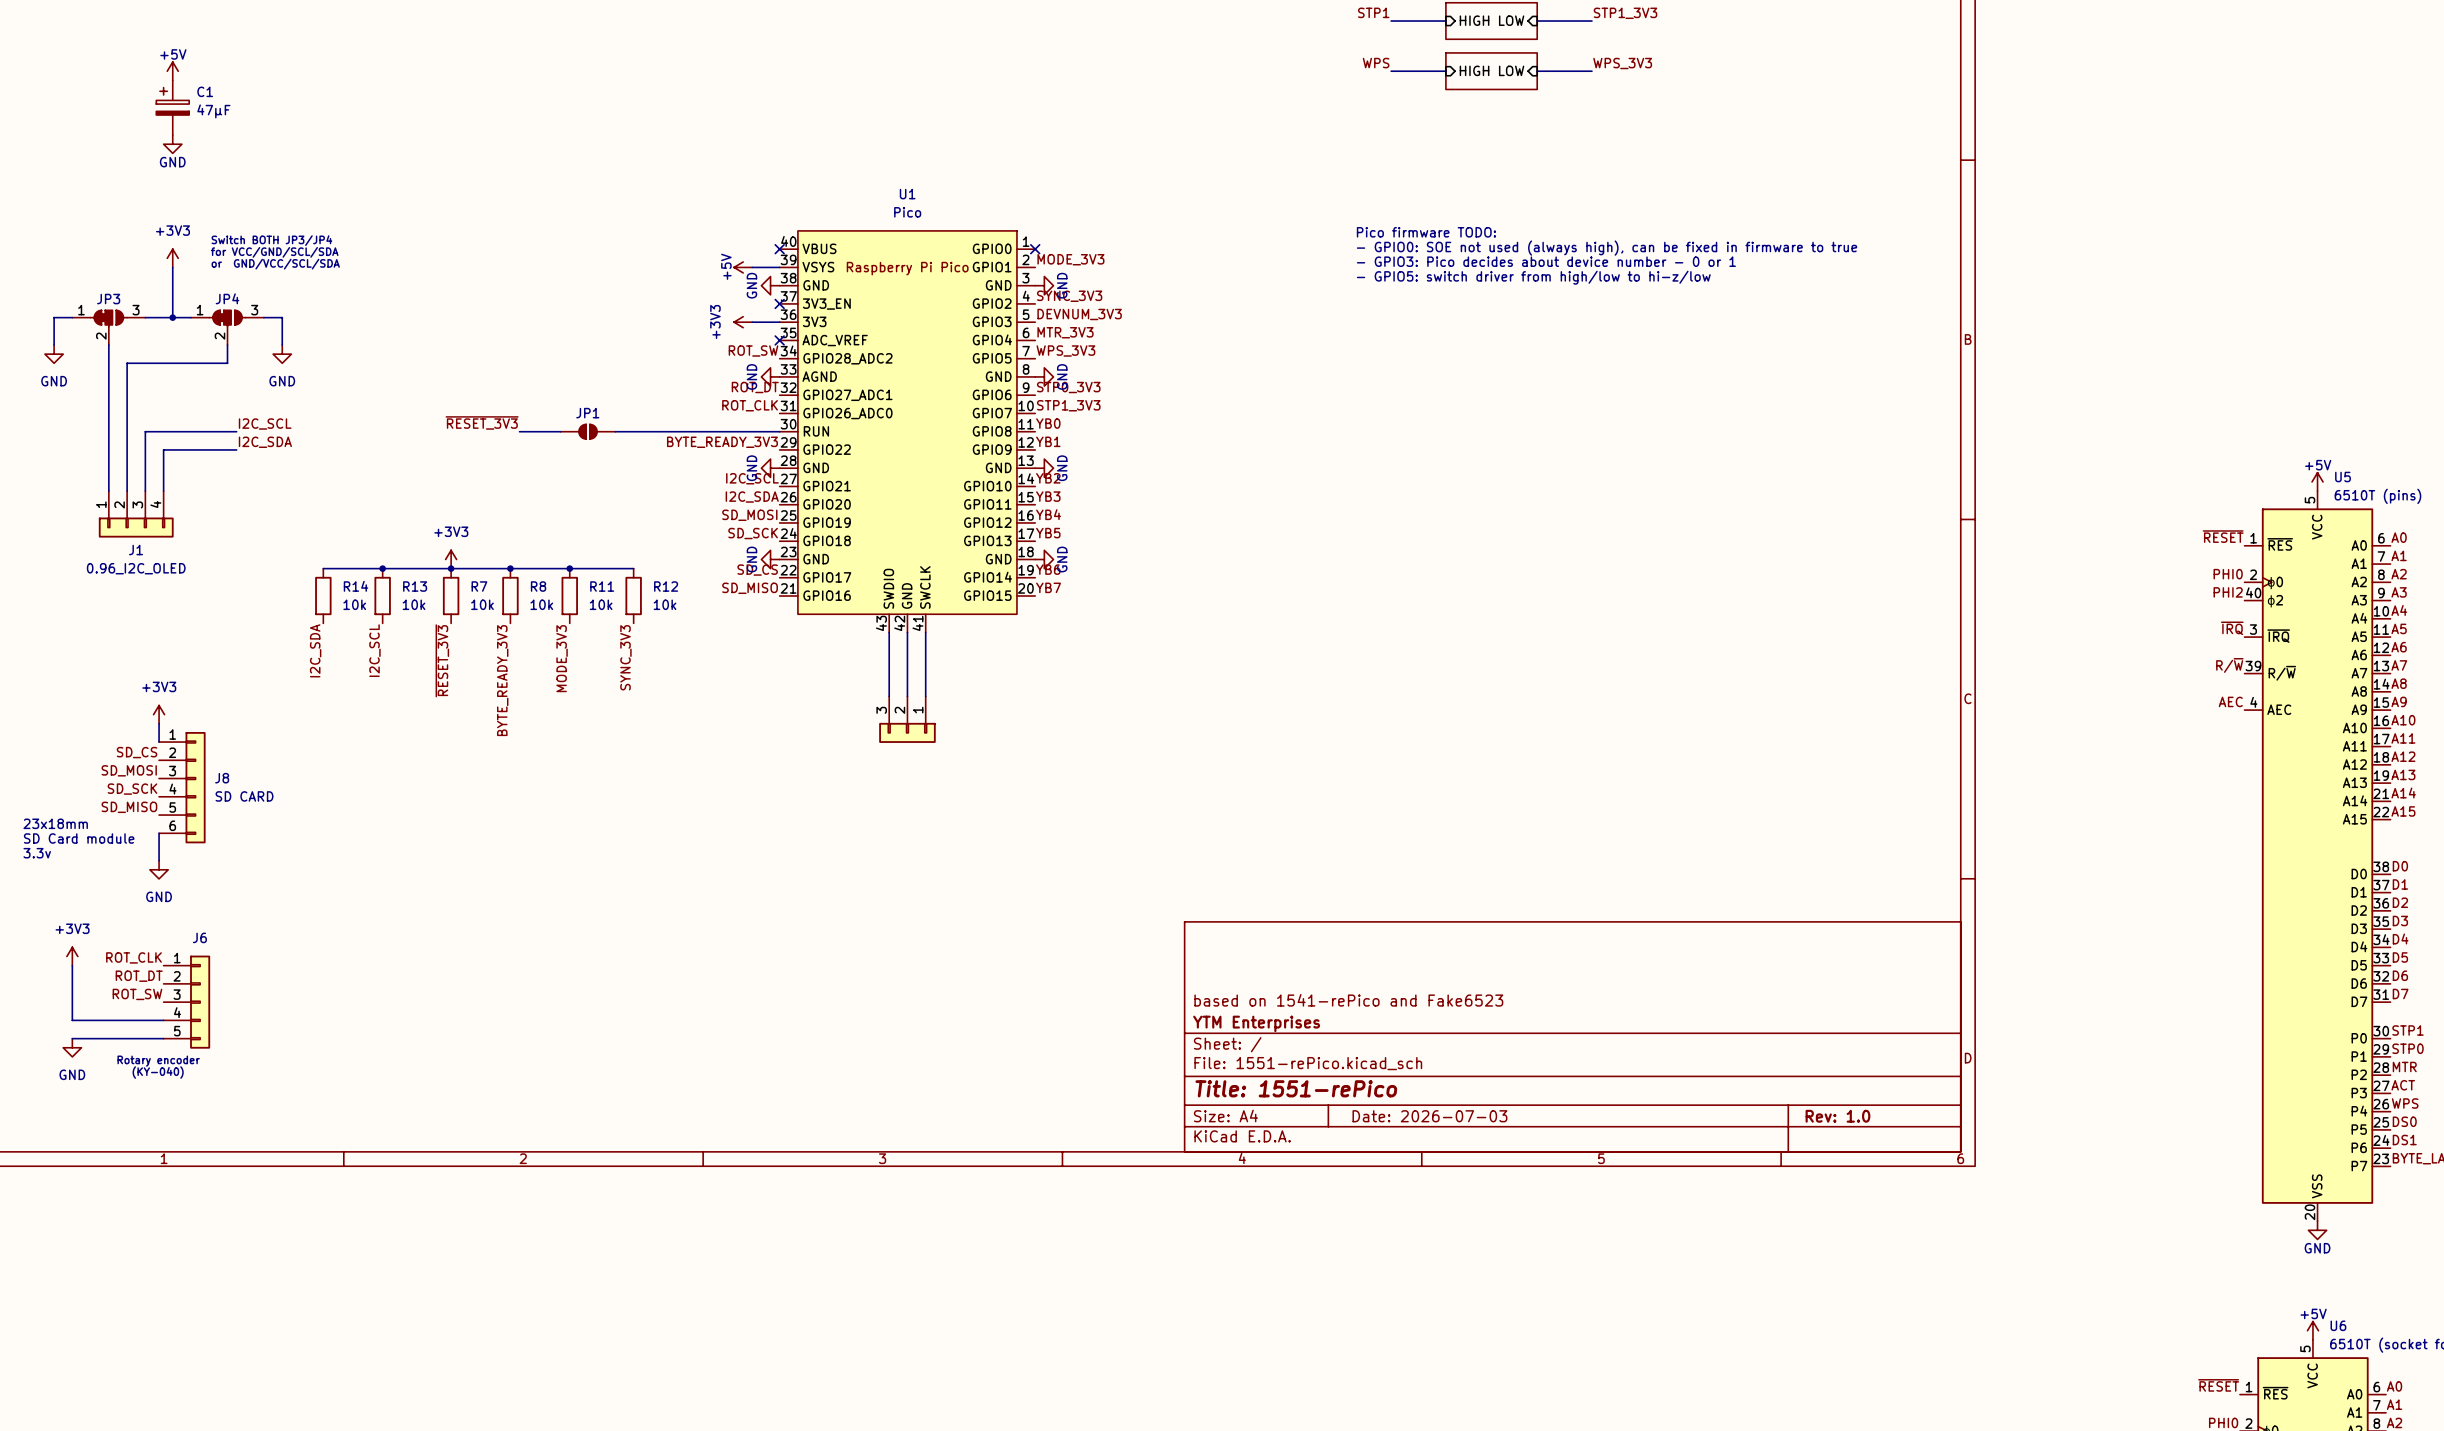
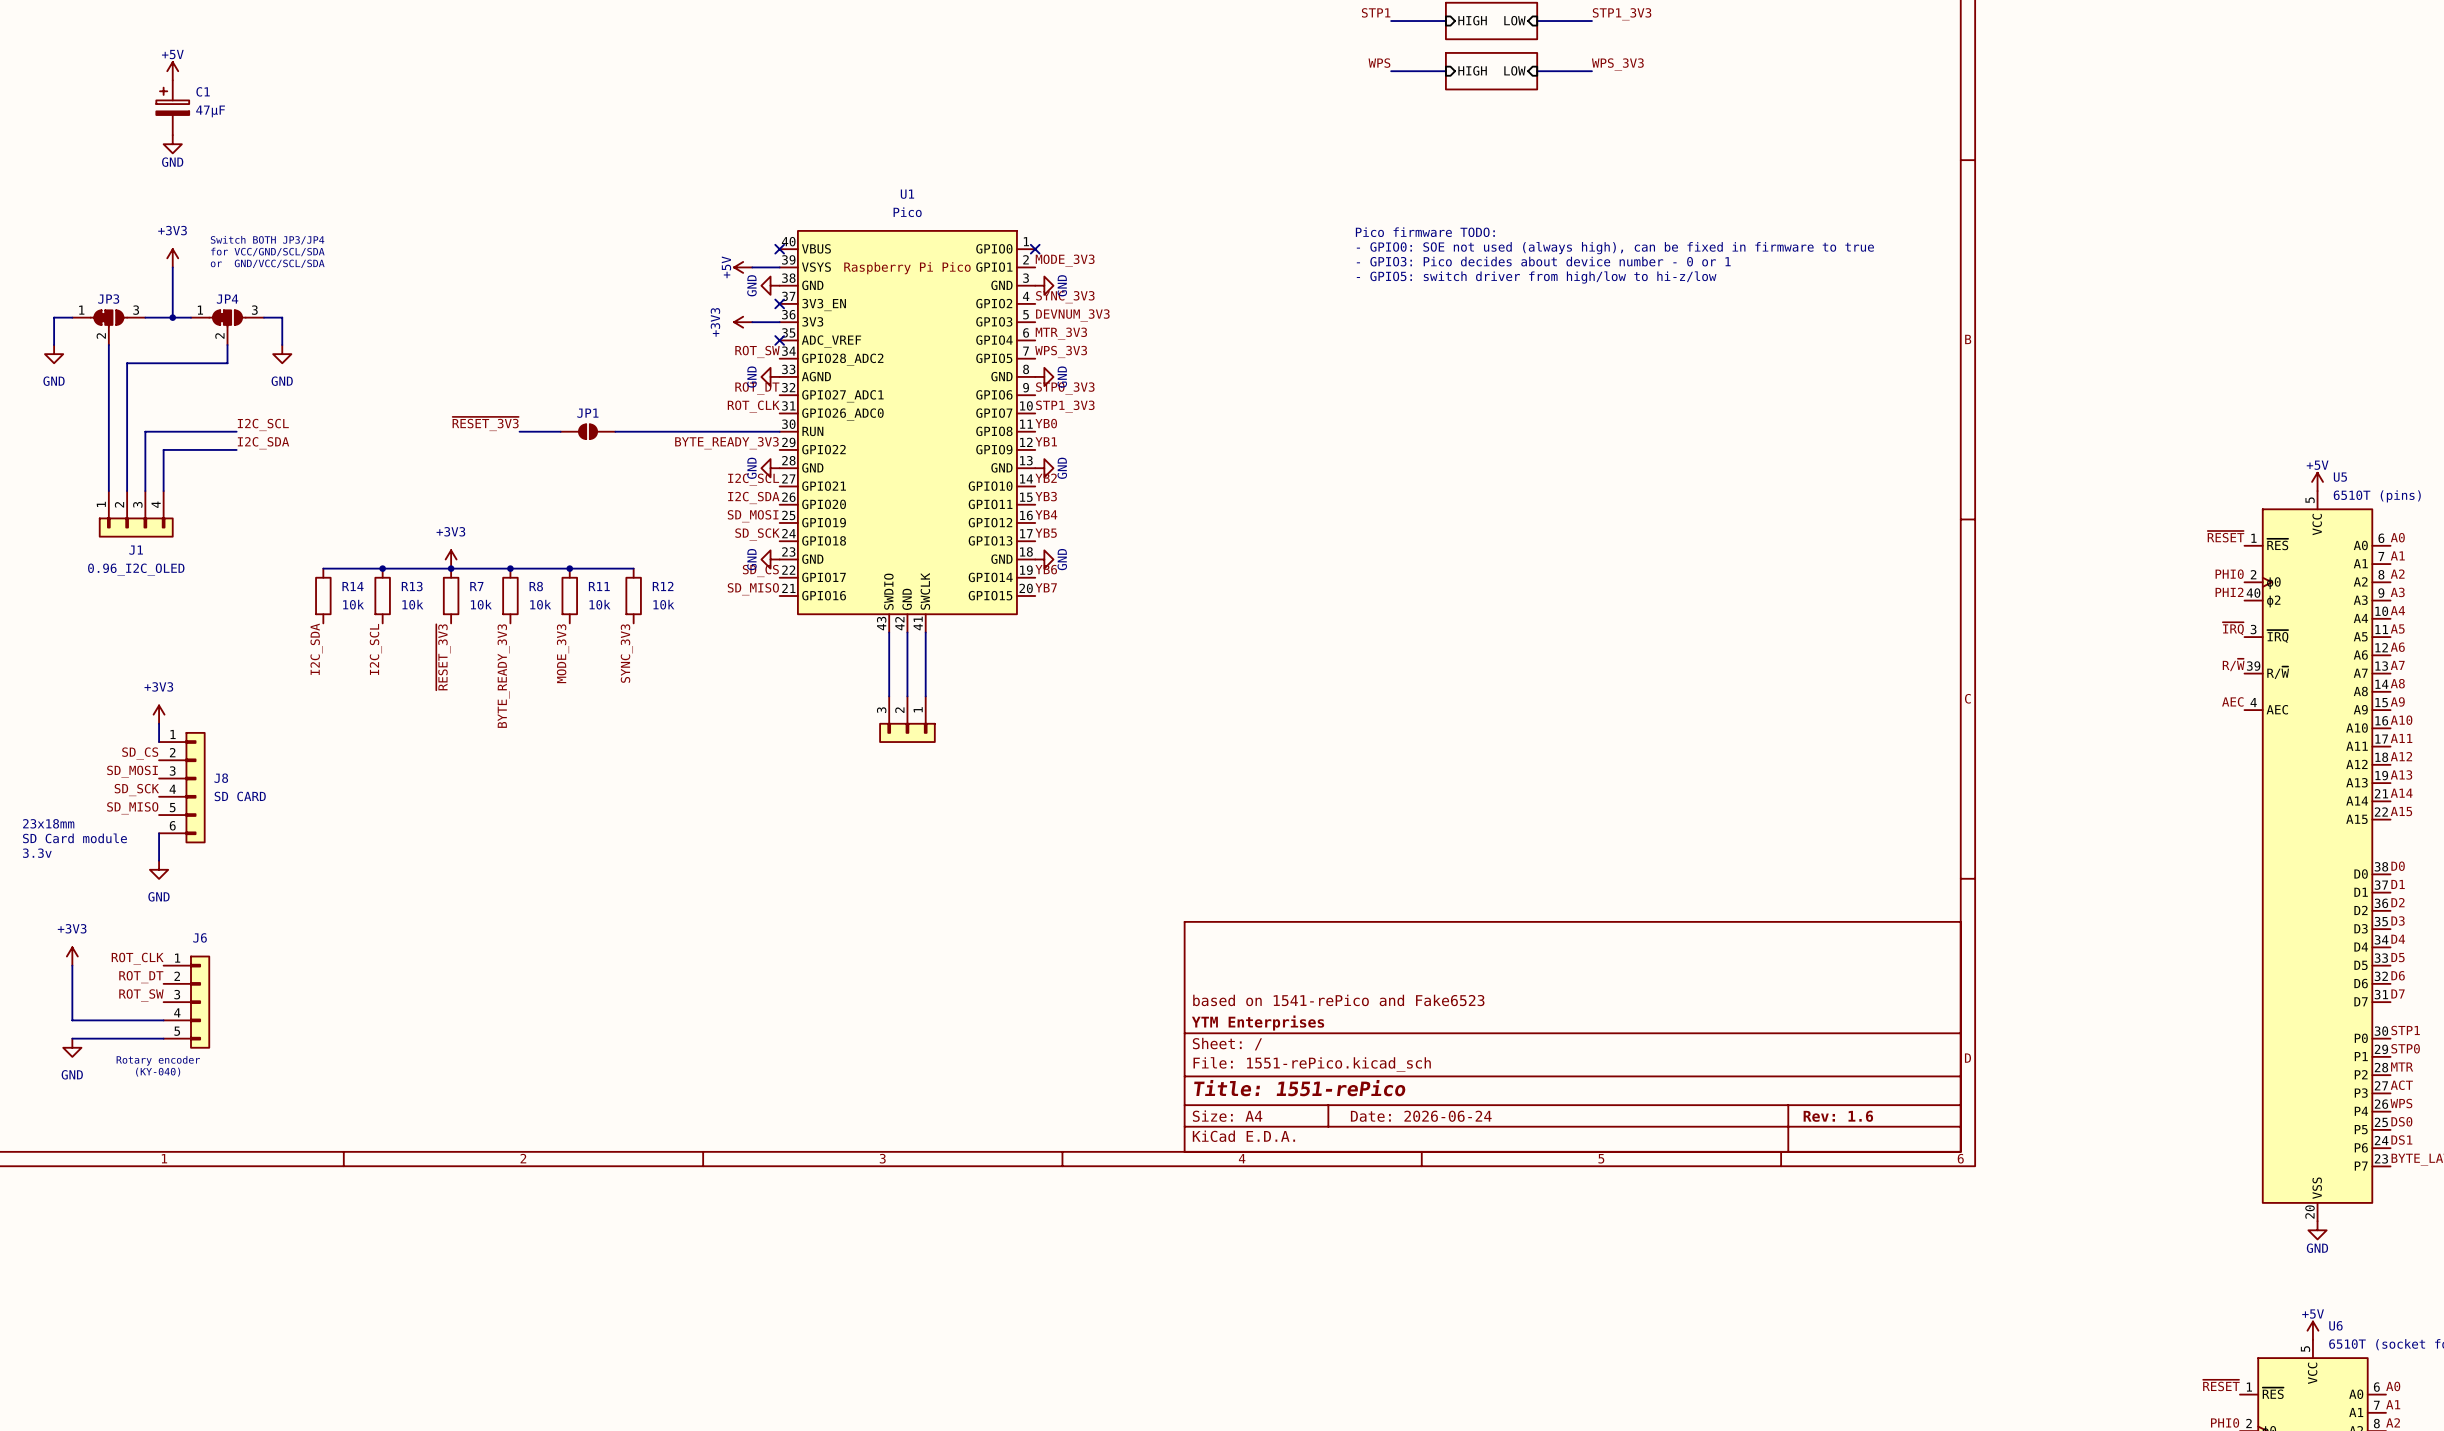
title block: Date: 2026-07-03 (1429, 1116) -> Date: 2026-06-24 (1421, 1116)
title block: Rev: 1.0 (1837, 1116) -> Rev: 1.6 (1838, 1116)

